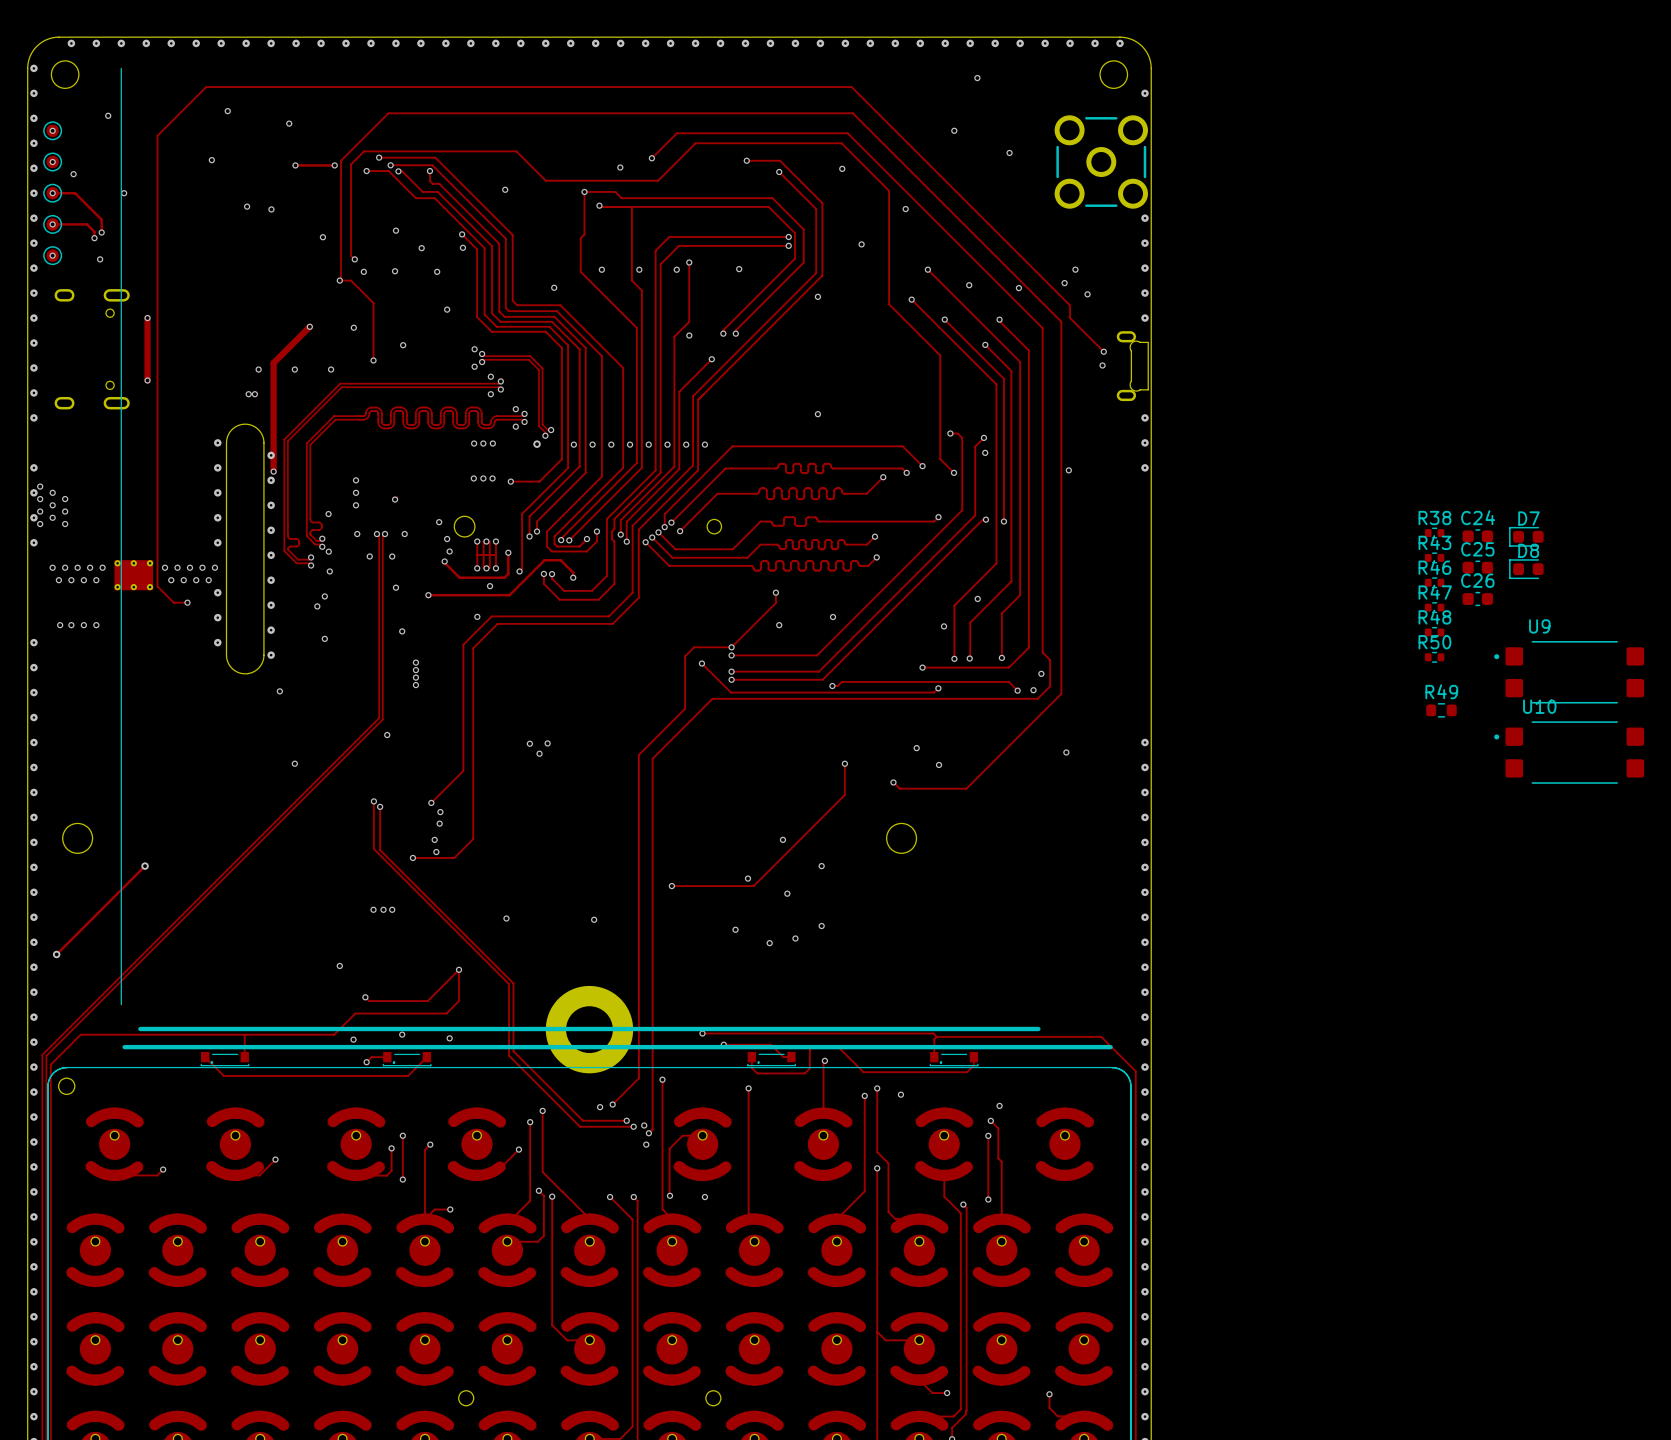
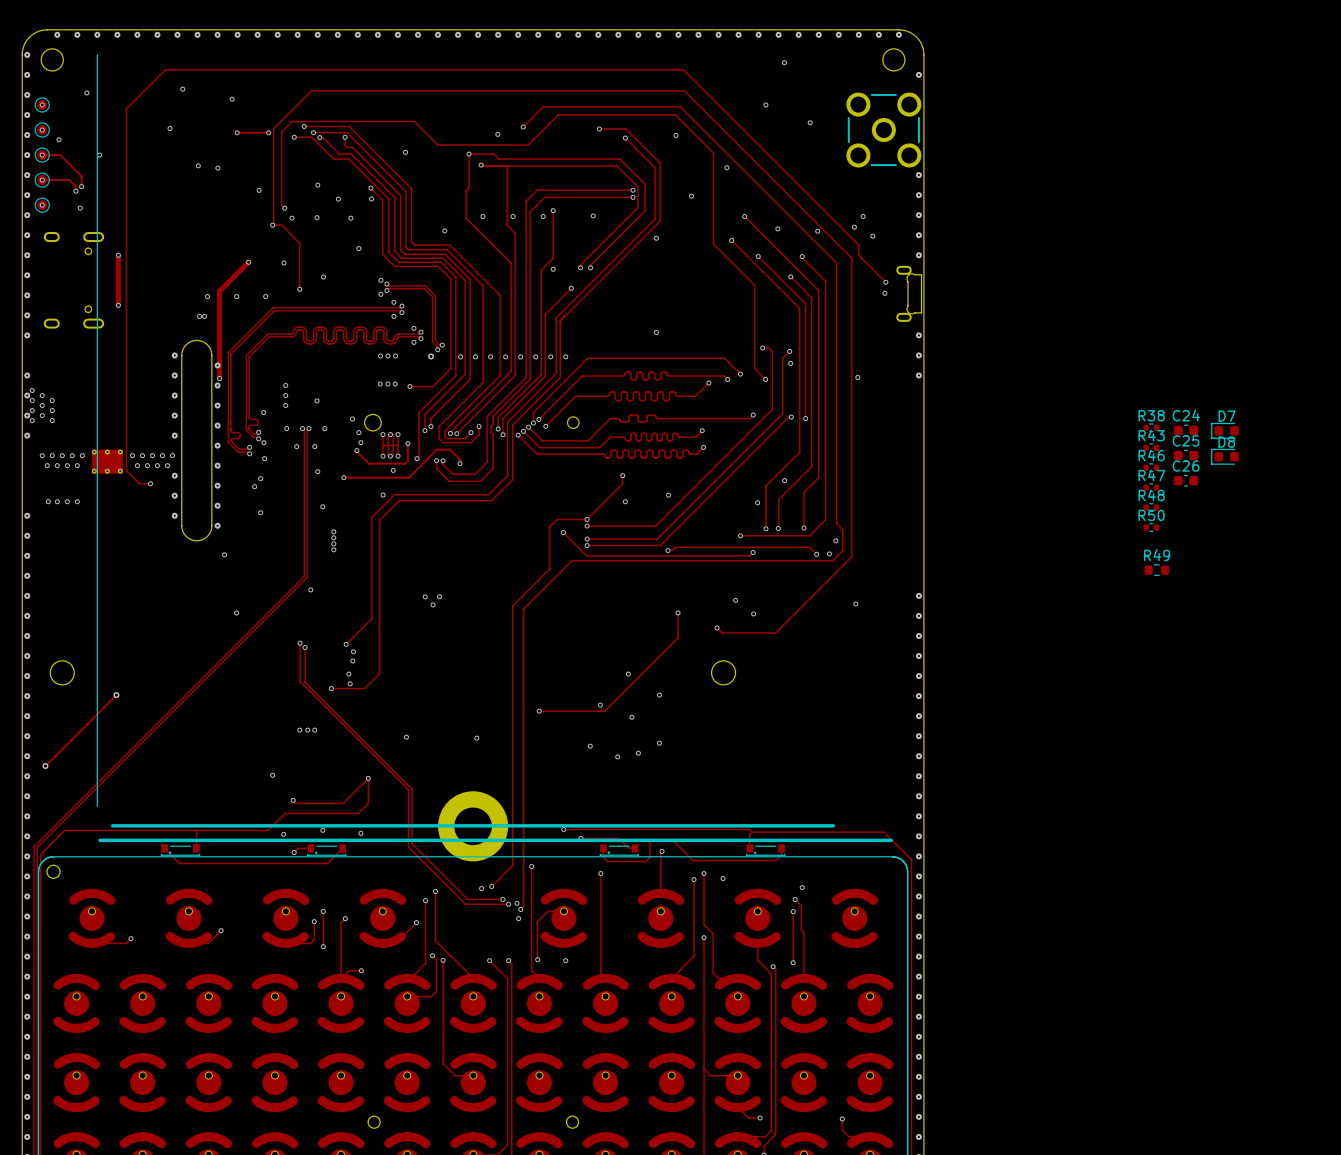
U9: (1569, 672) -> none
U10: (1569, 752) -> none

